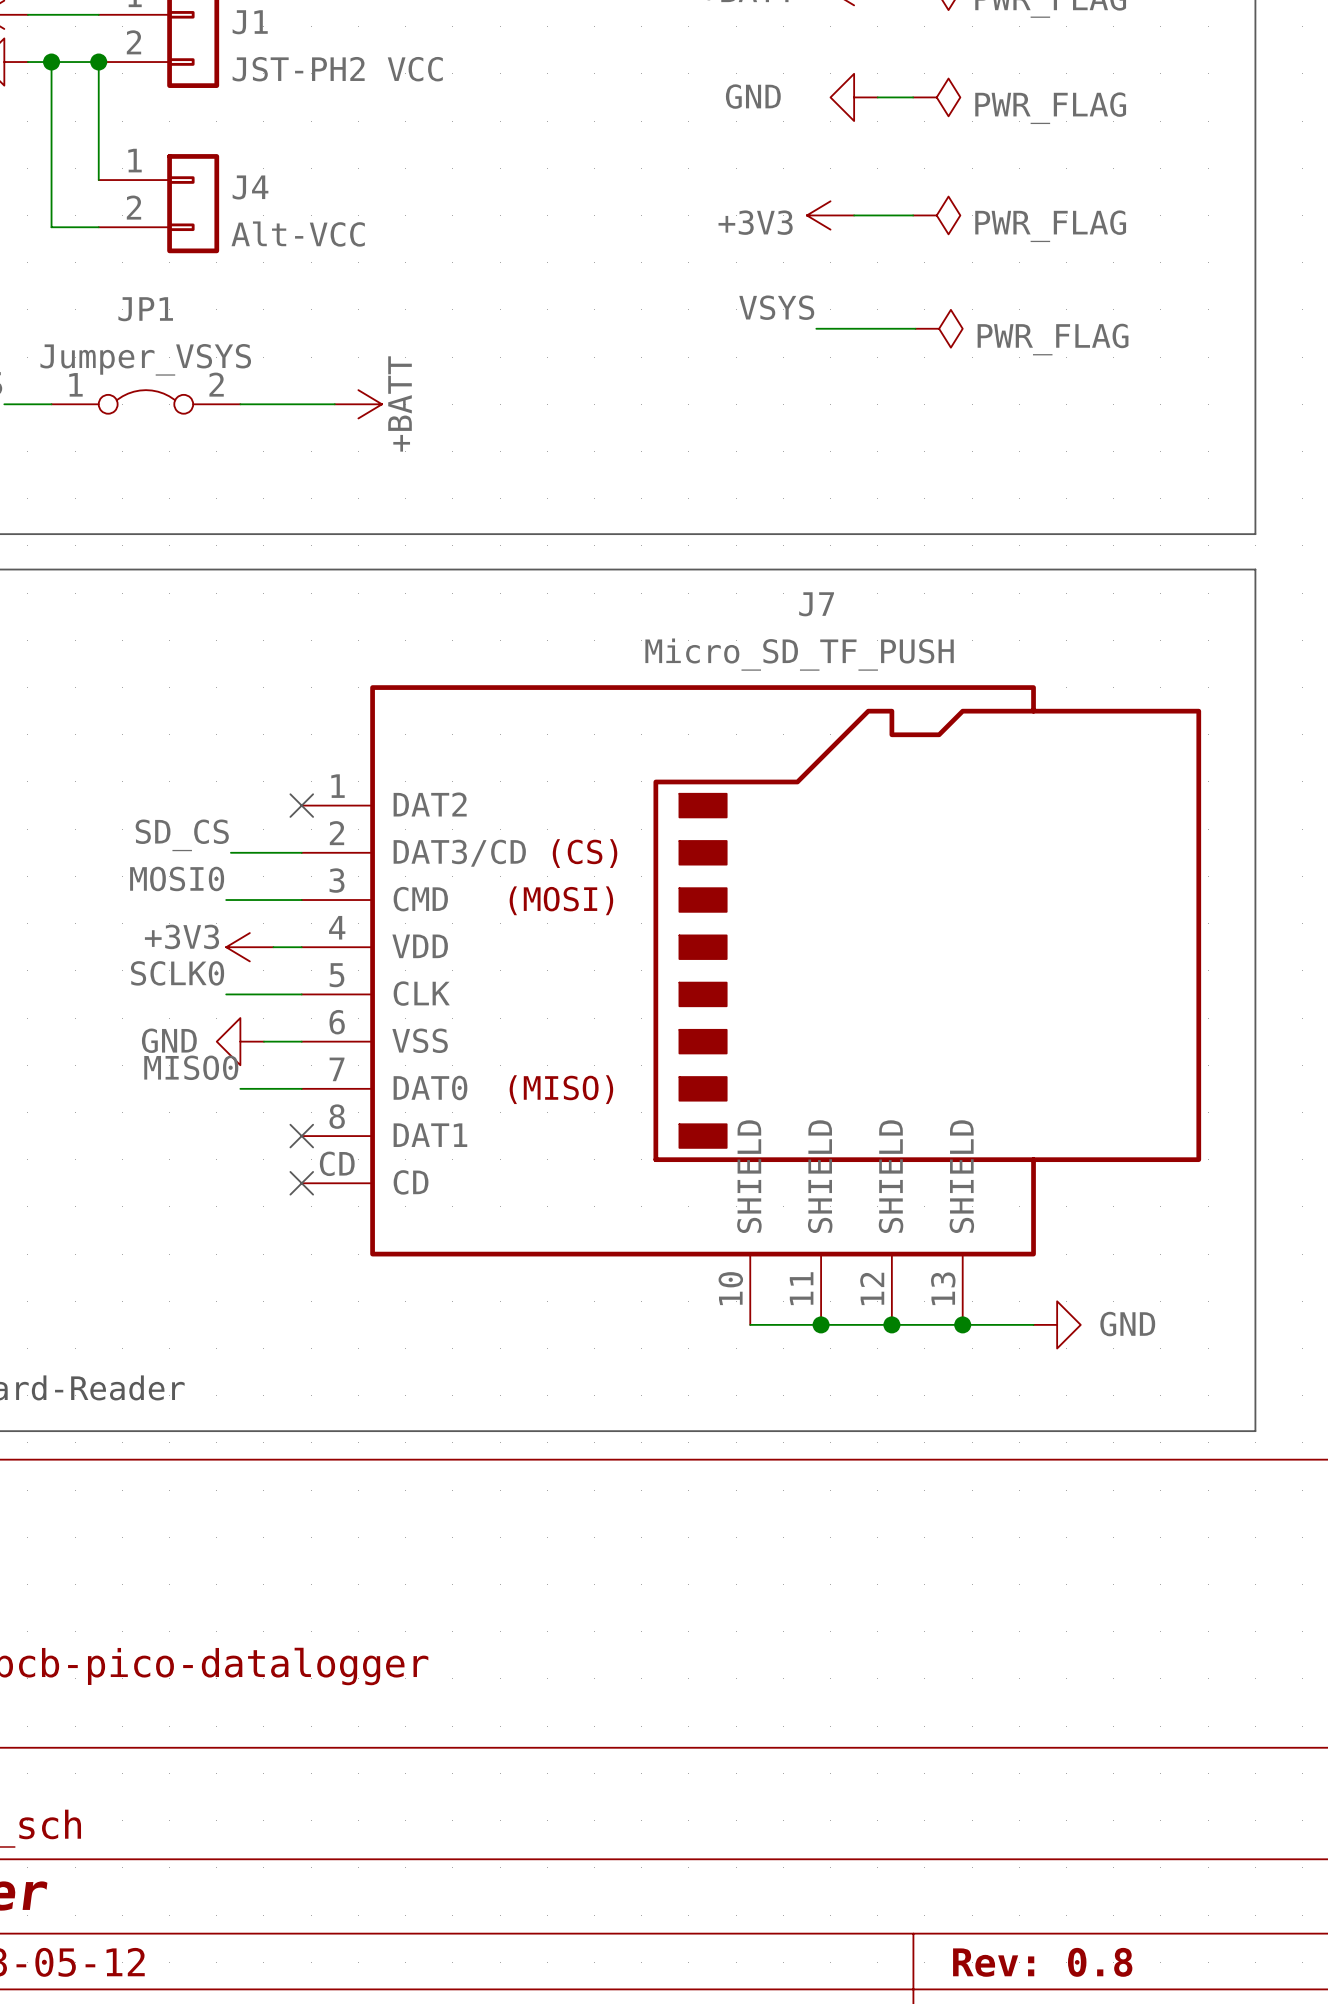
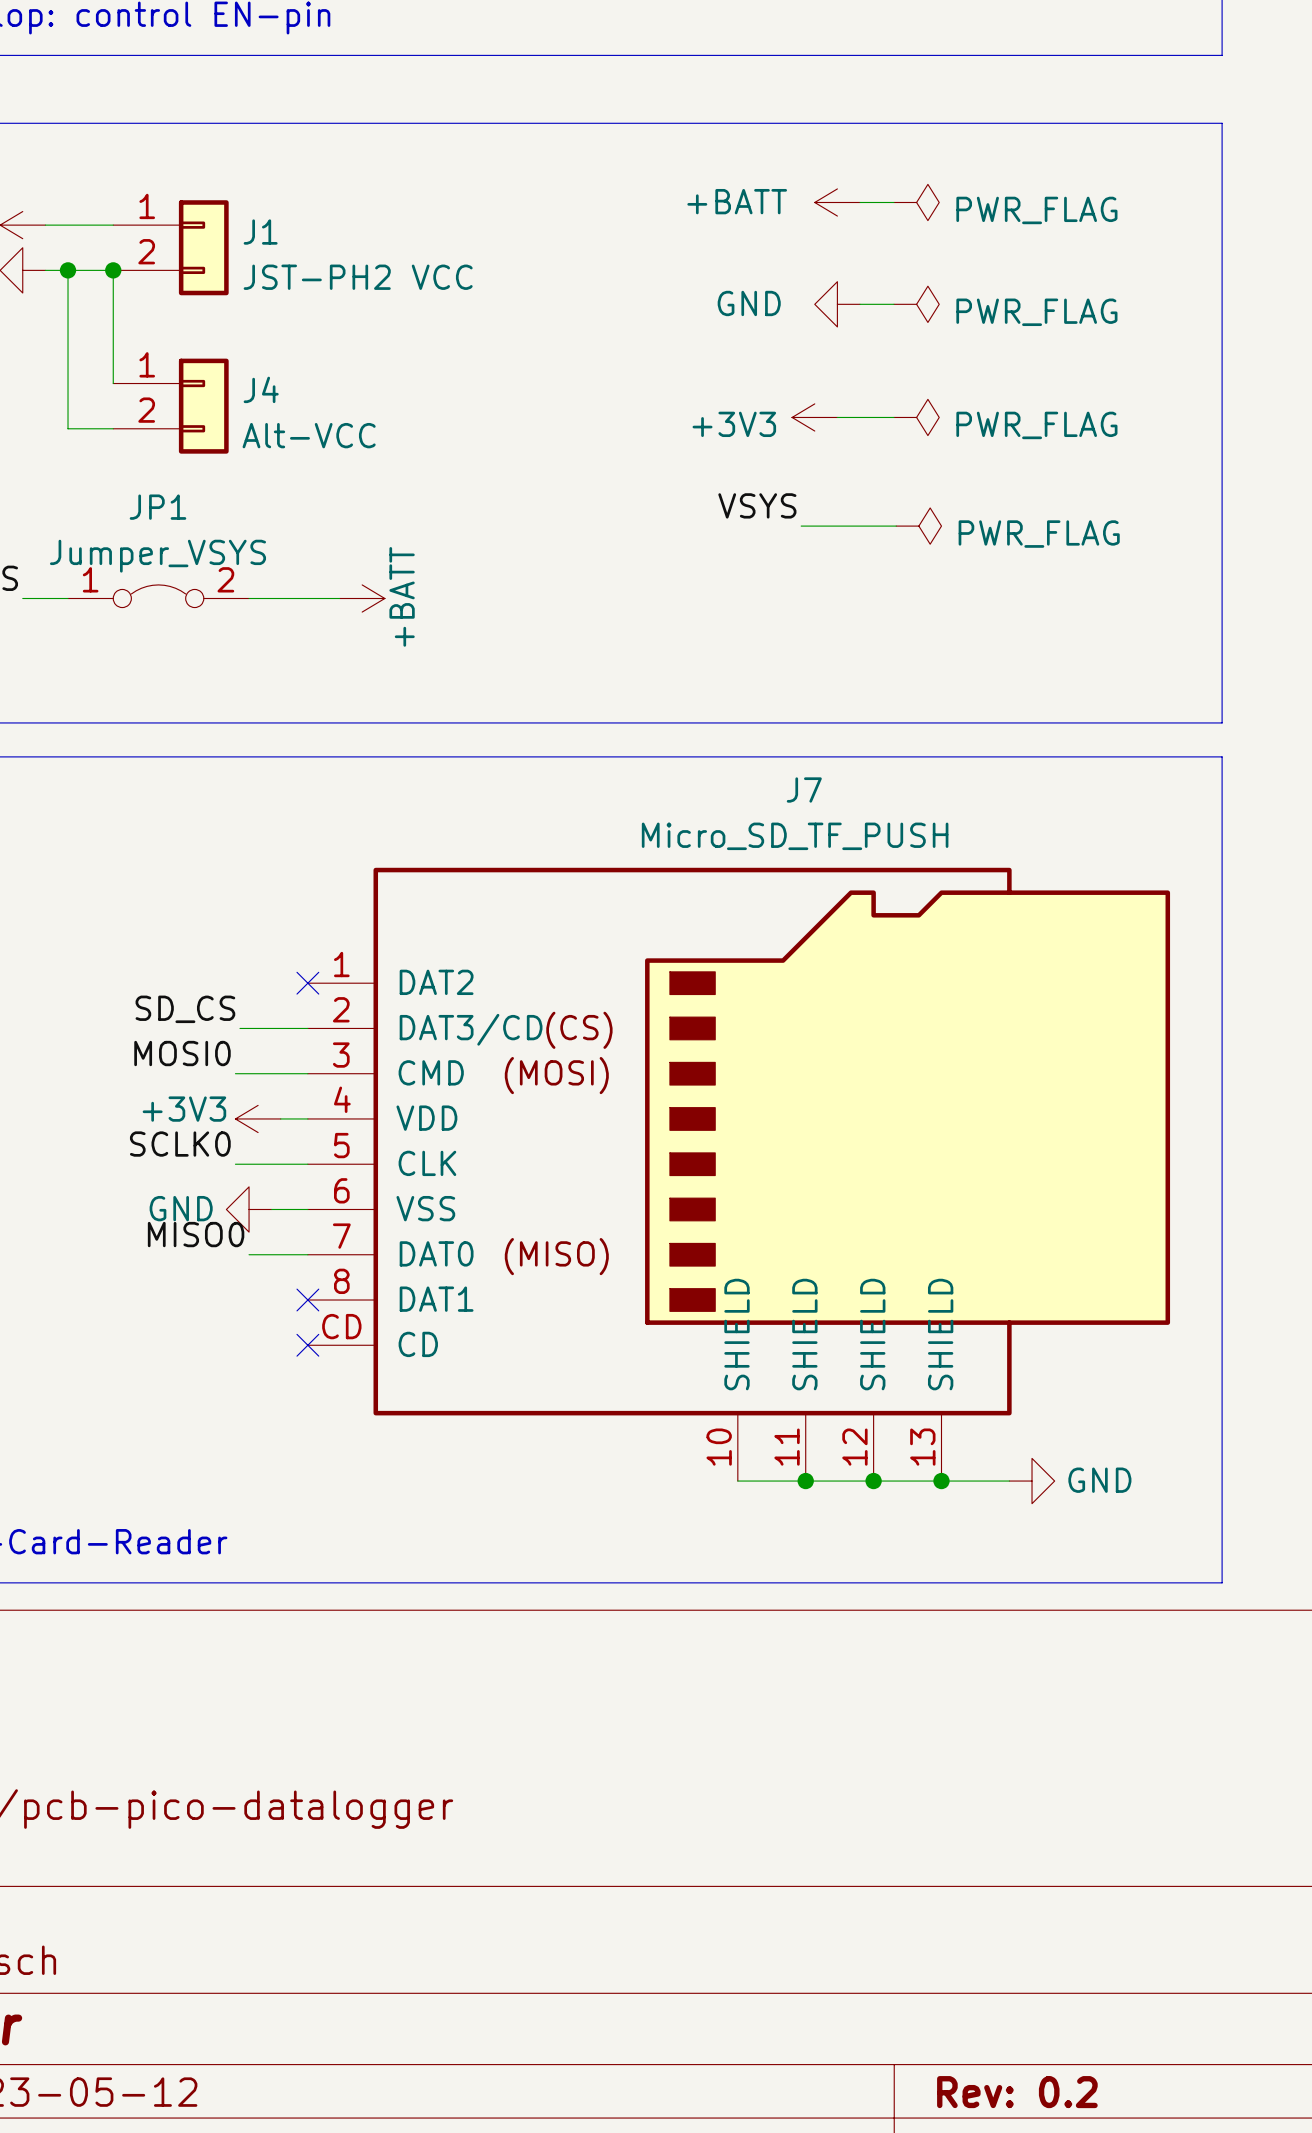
title block: Rev: 0.8 (1042, 1962) -> Rev: 0.2 (1017, 2092)

